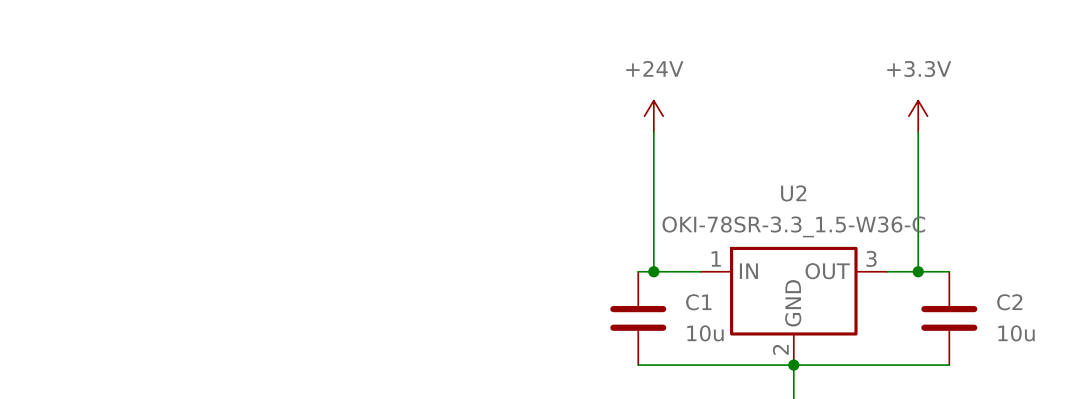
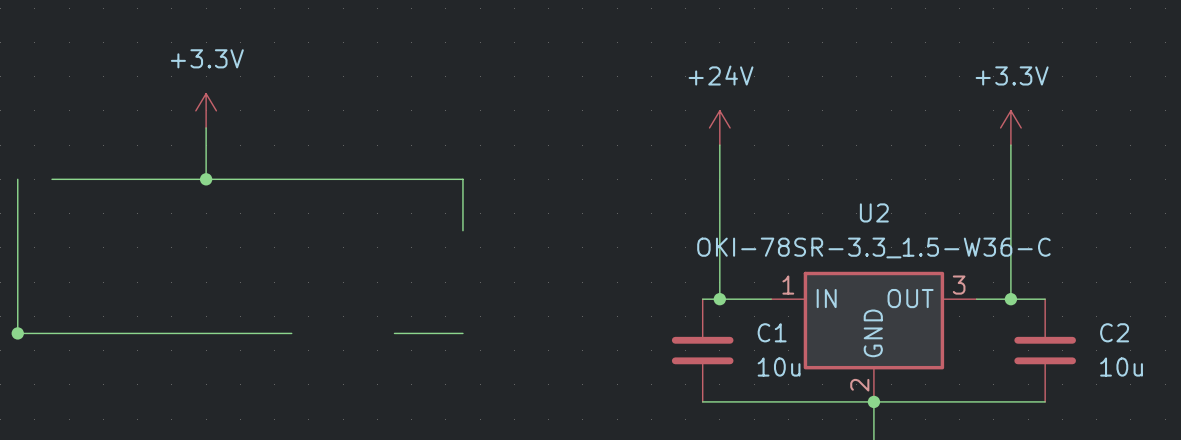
power symbol: none -> +3.3V (206, 110)
wire: none -> (206, 127) (206, 179)
wire: none -> (17, 179) (17, 333) (291, 333)
wire: none -> (52, 179) (462, 179) (462, 230)
junction: none -> (206, 179)
junction: none -> (17, 333)
wire: none -> (394, 333) (462, 333)

